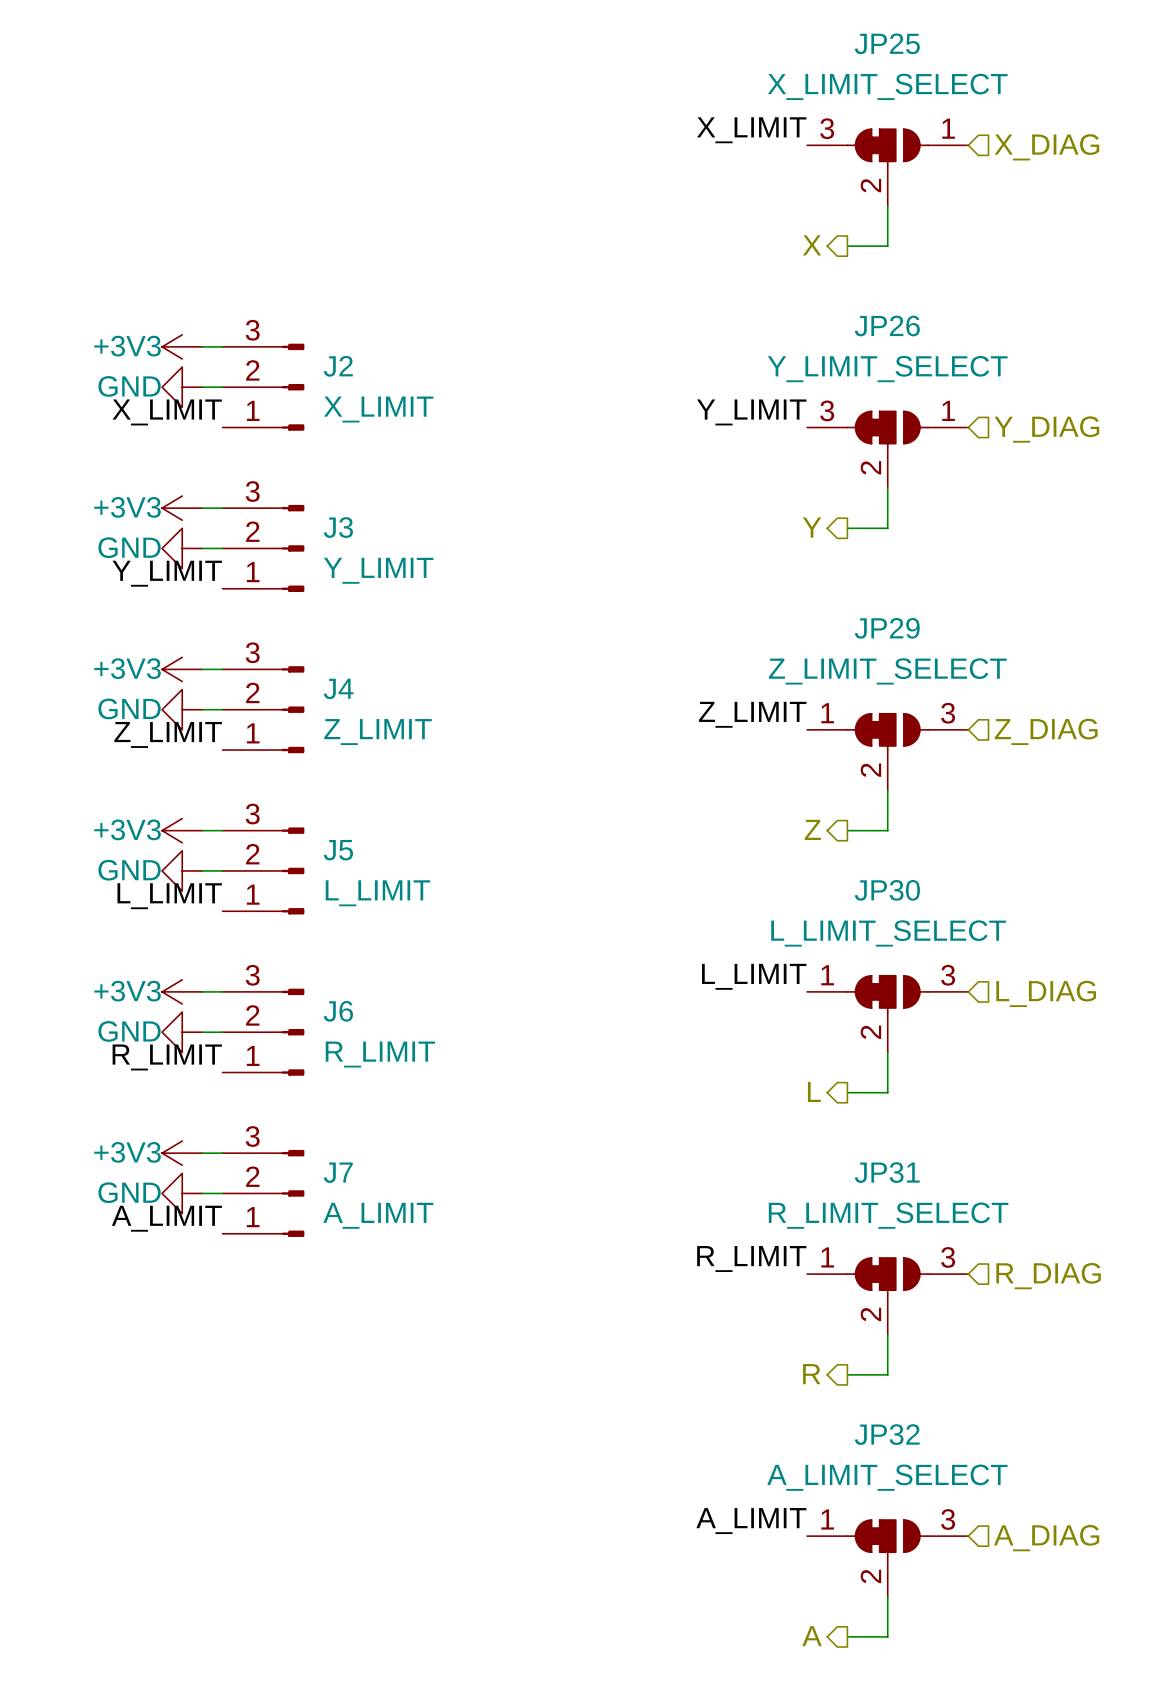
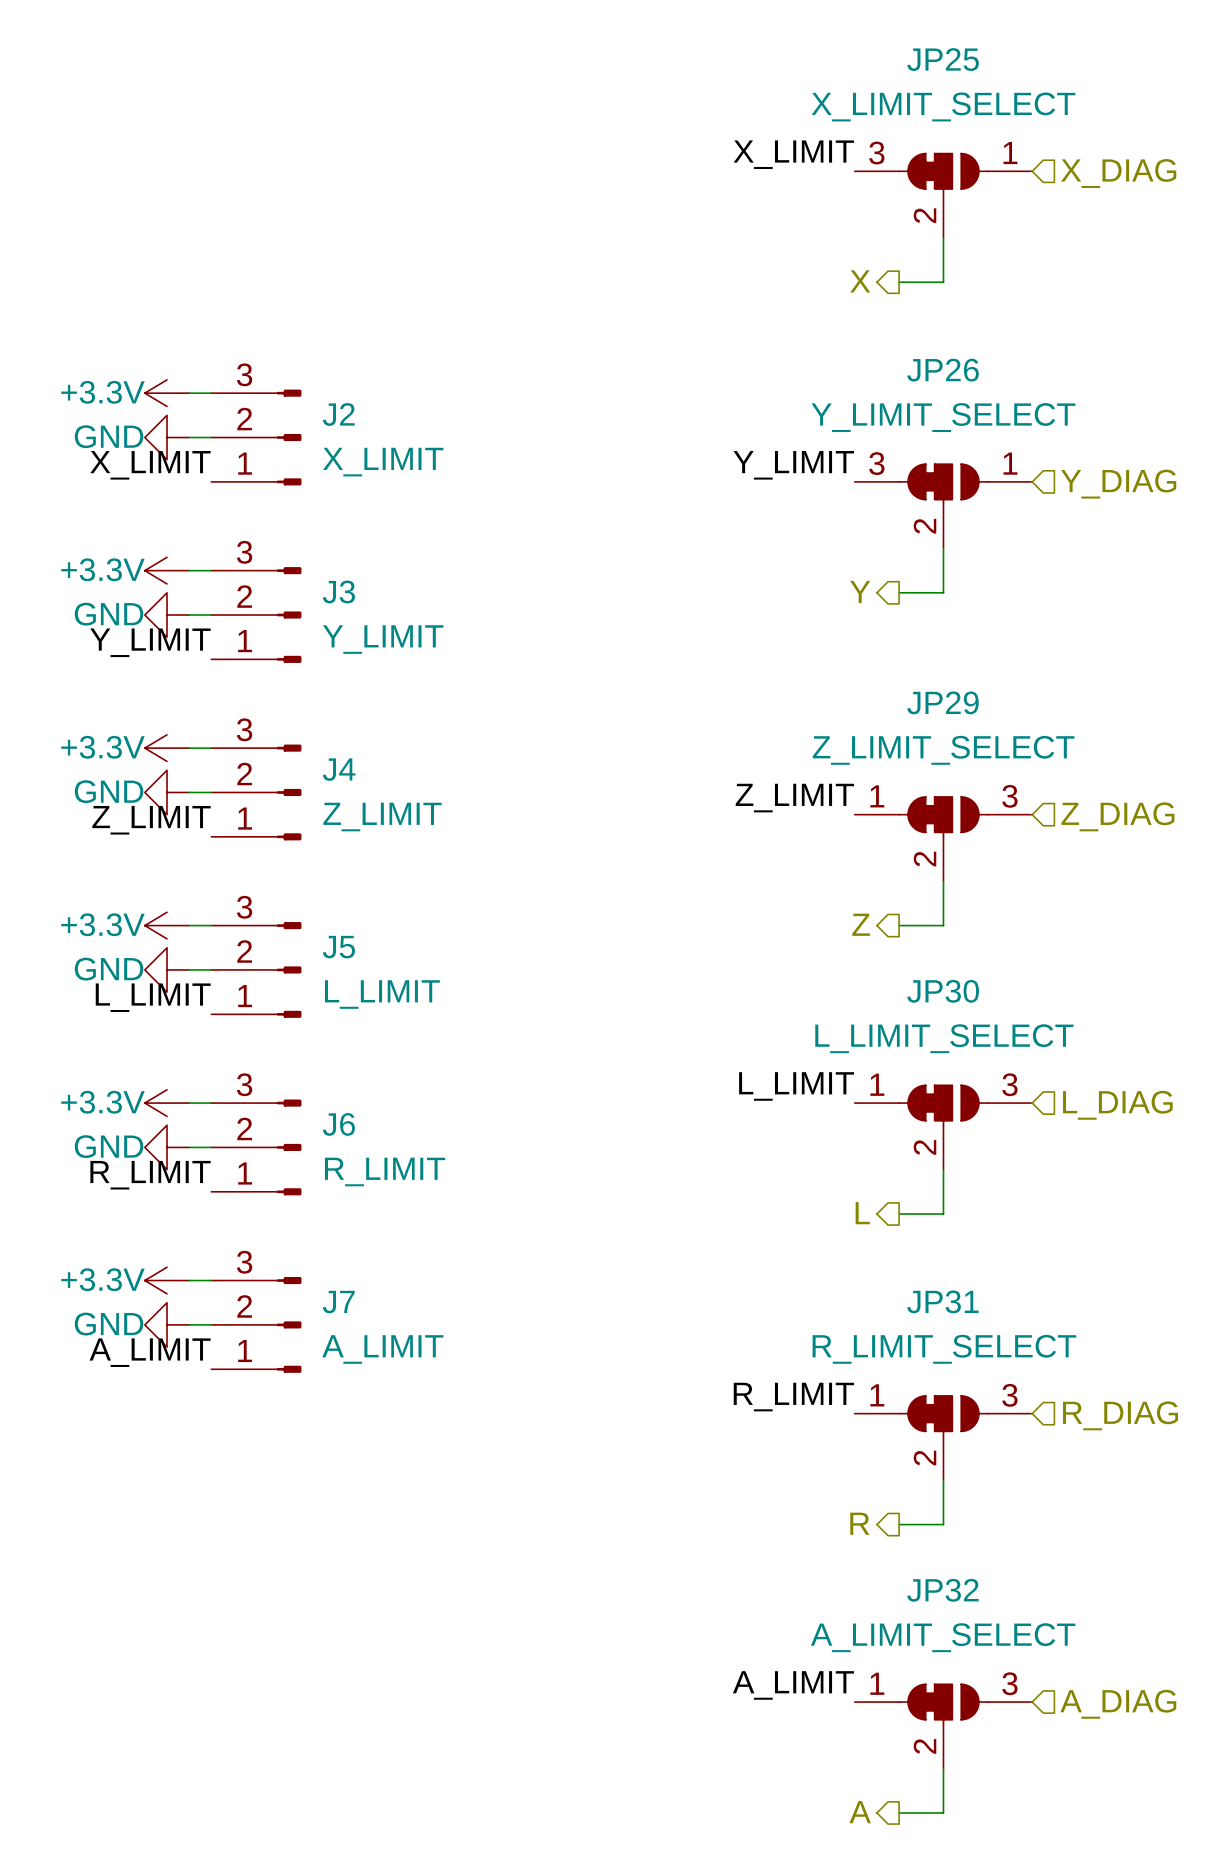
power symbol: +3V3 (182, 346) -> +3.3V (167, 393)
power symbol: +3V3 (182, 508) -> +3.3V (167, 570)
power symbol: +3V3 (182, 669) -> +3.3V (167, 748)
power symbol: +3V3 (182, 830) -> +3.3V (167, 925)
power symbol: +3V3 (182, 991) -> +3.3V (167, 1103)
power symbol: +3V3 (182, 1153) -> +3.3V (167, 1280)

